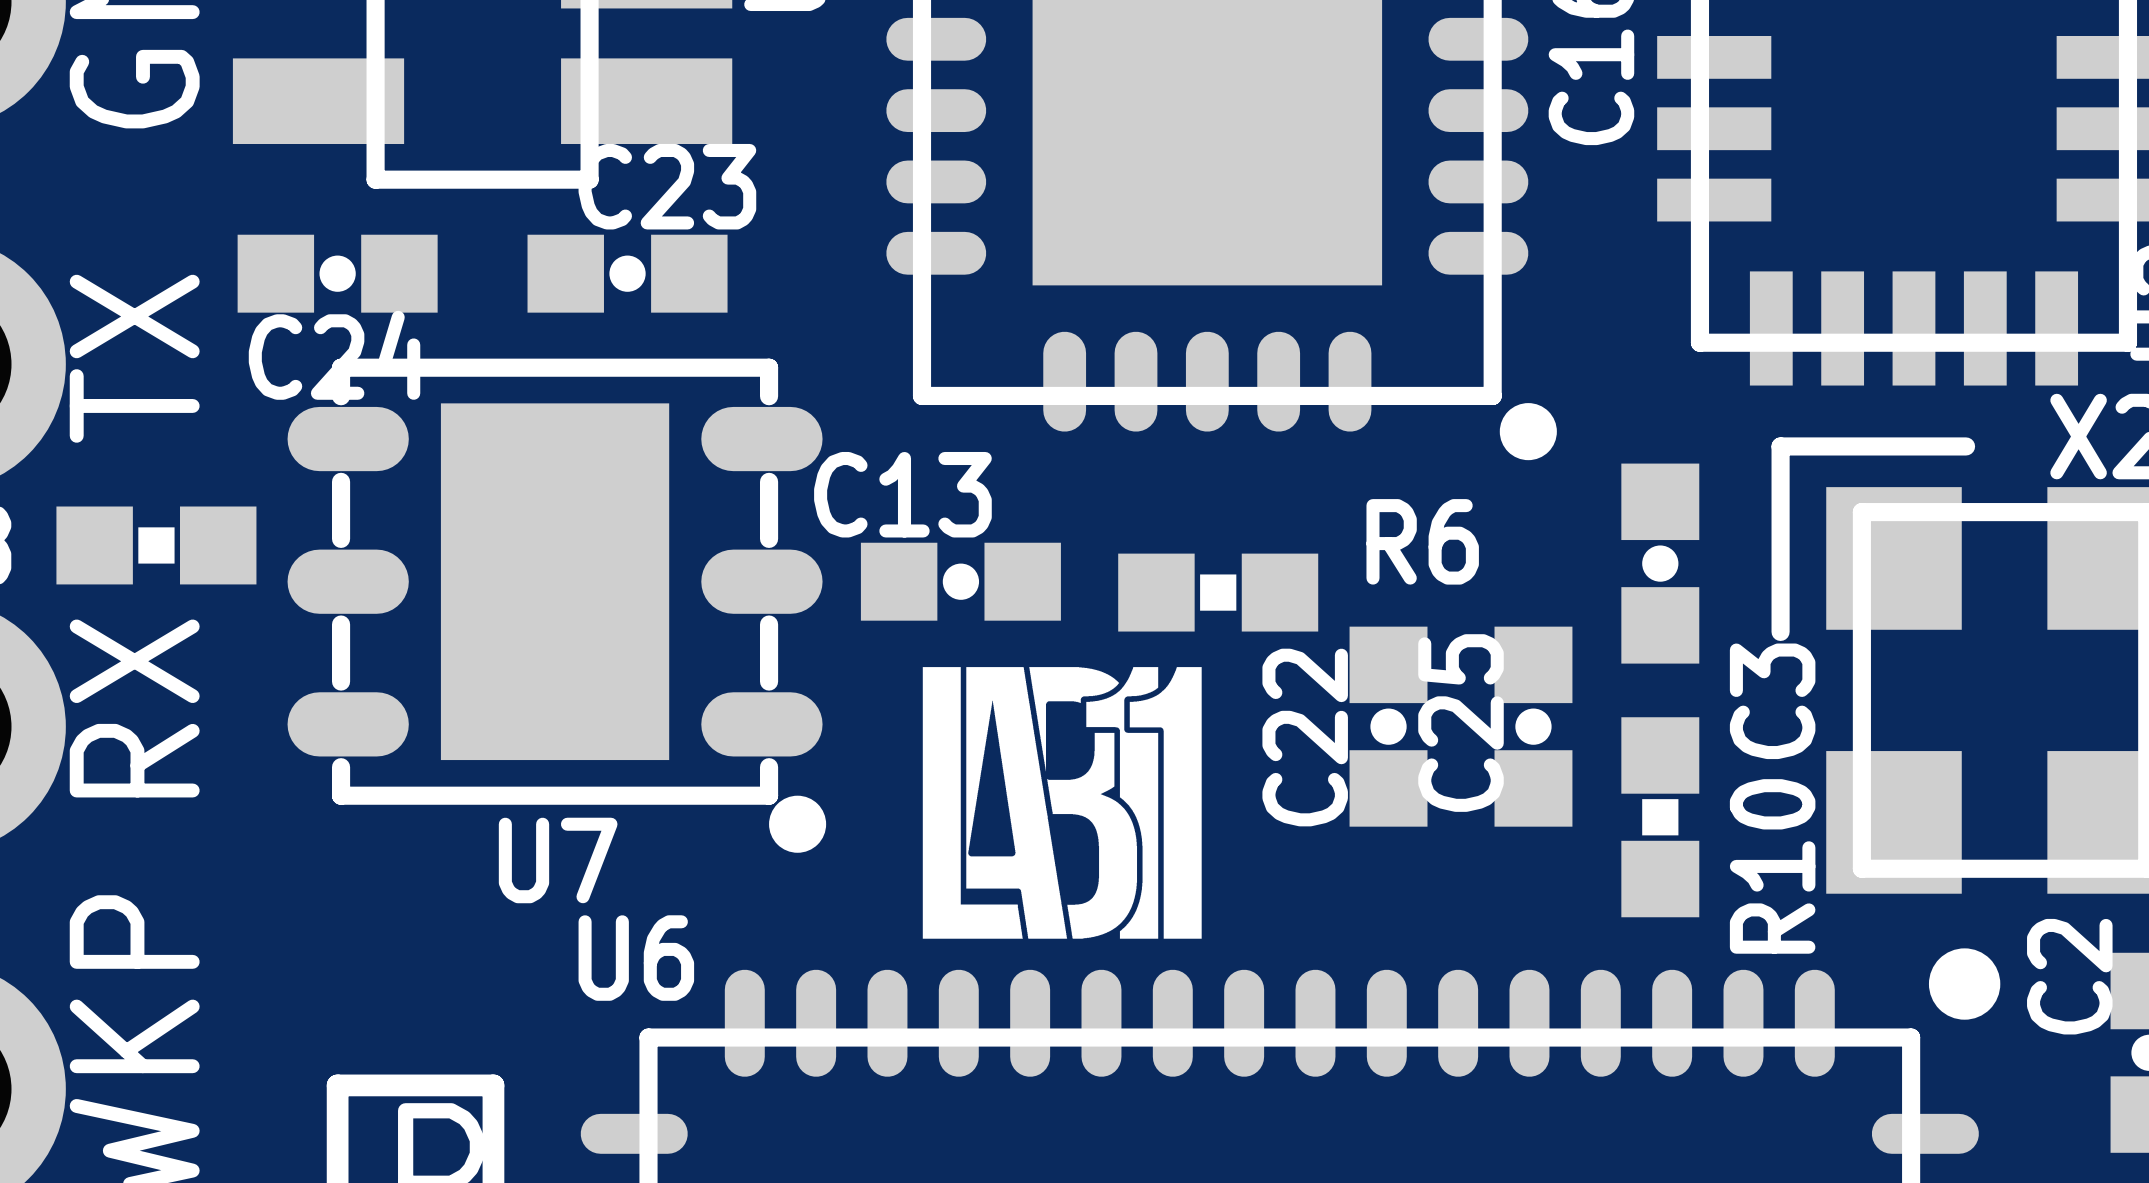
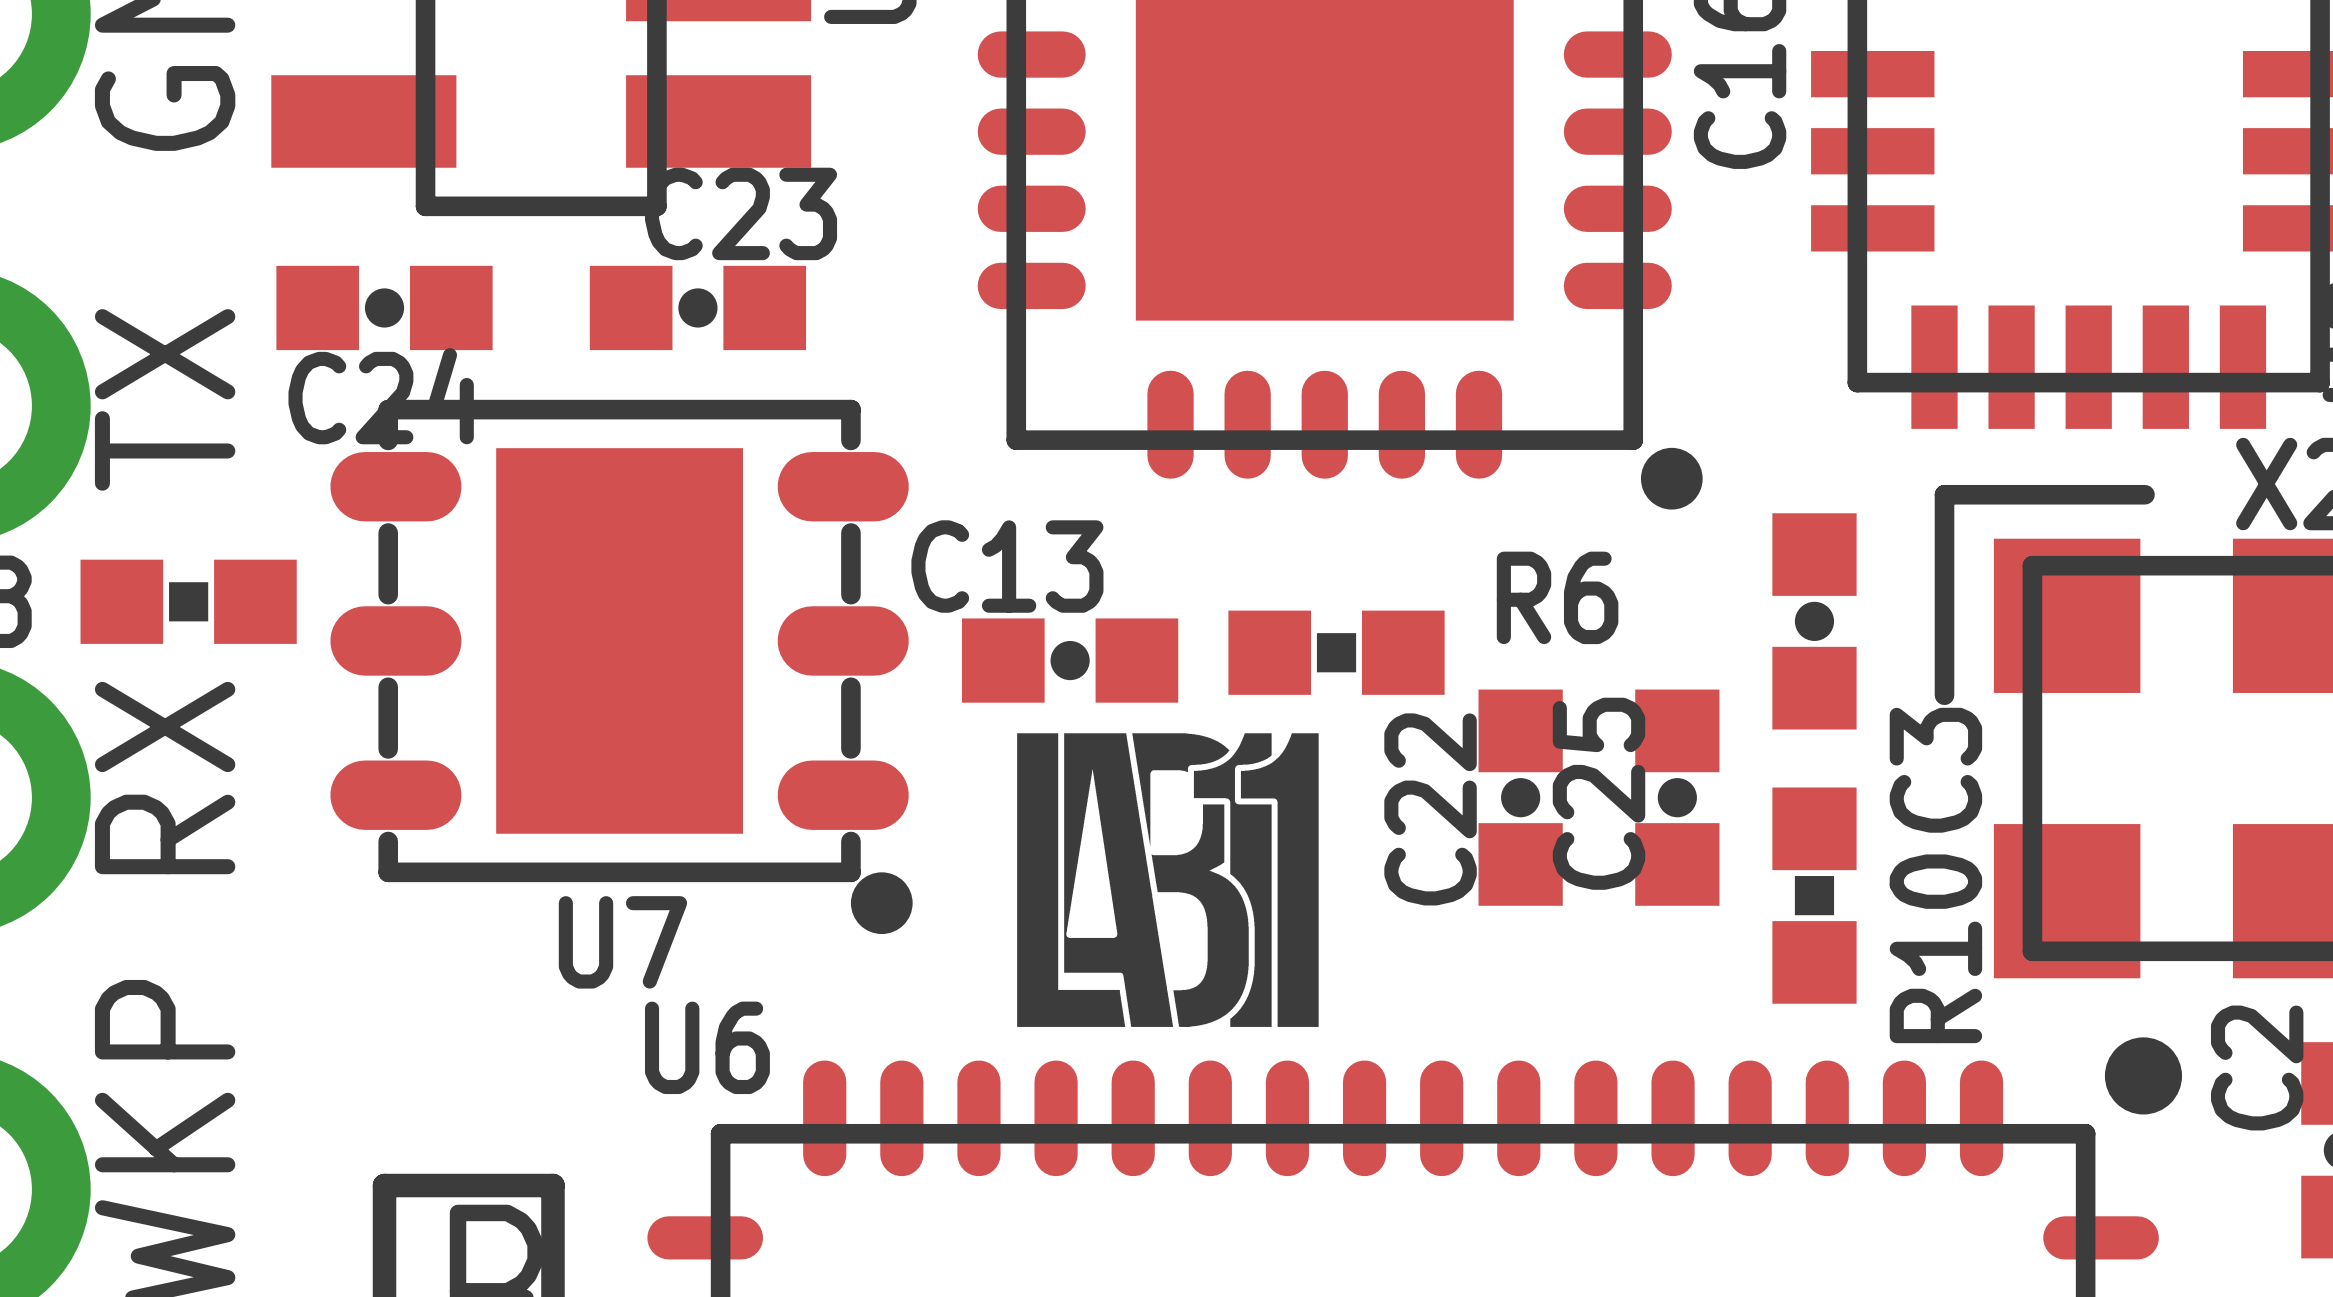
C13 position: (960, 581) -> (1070, 660)

